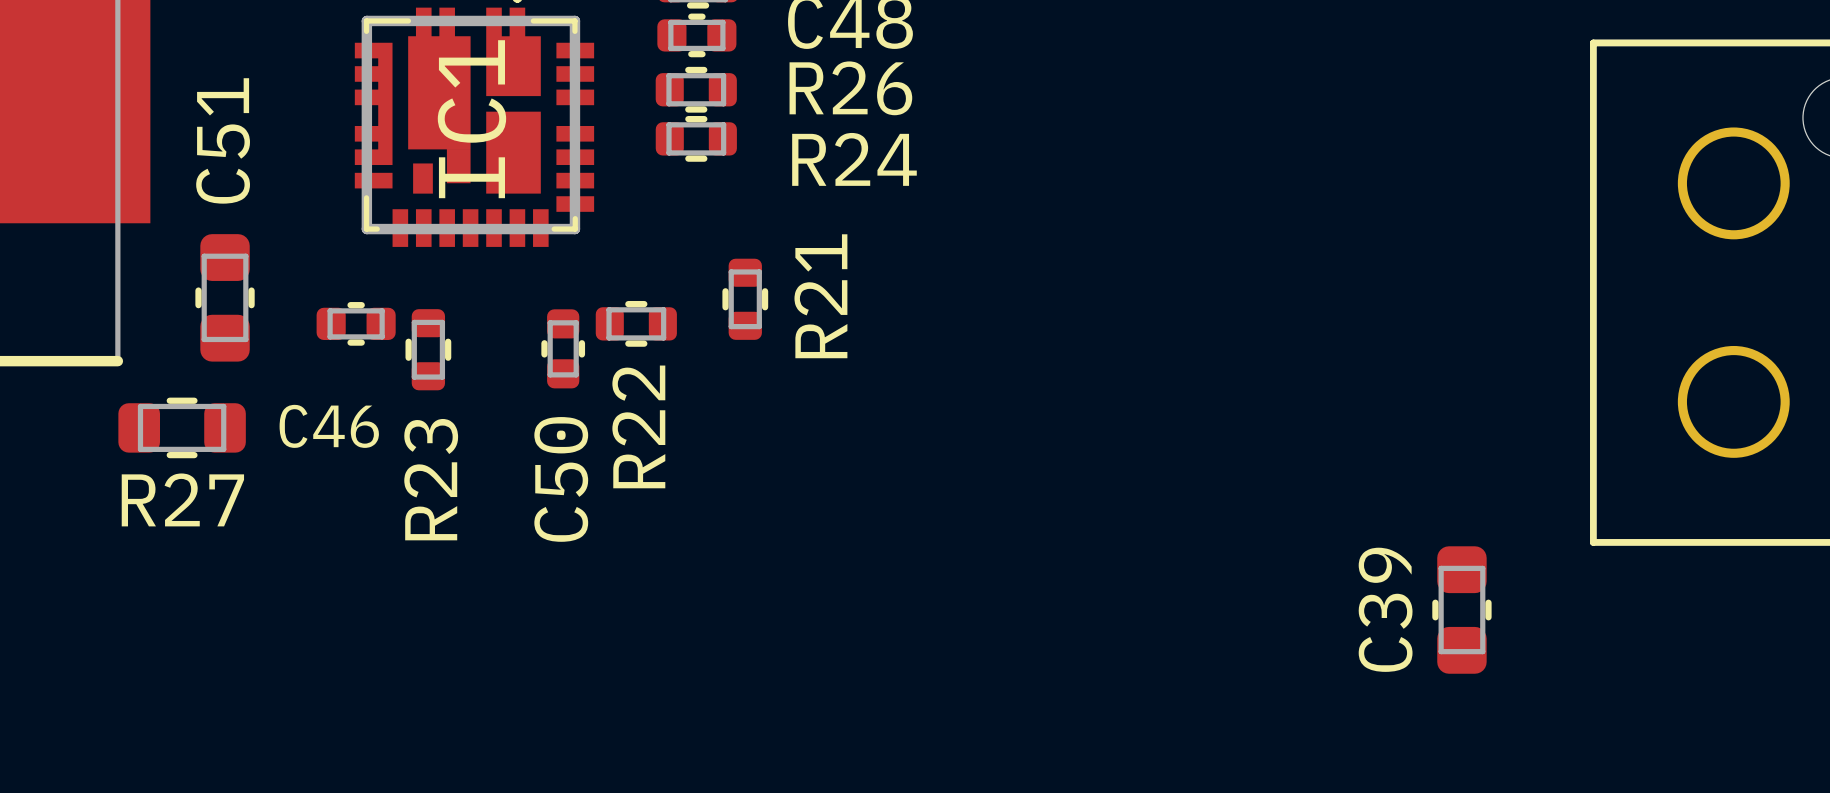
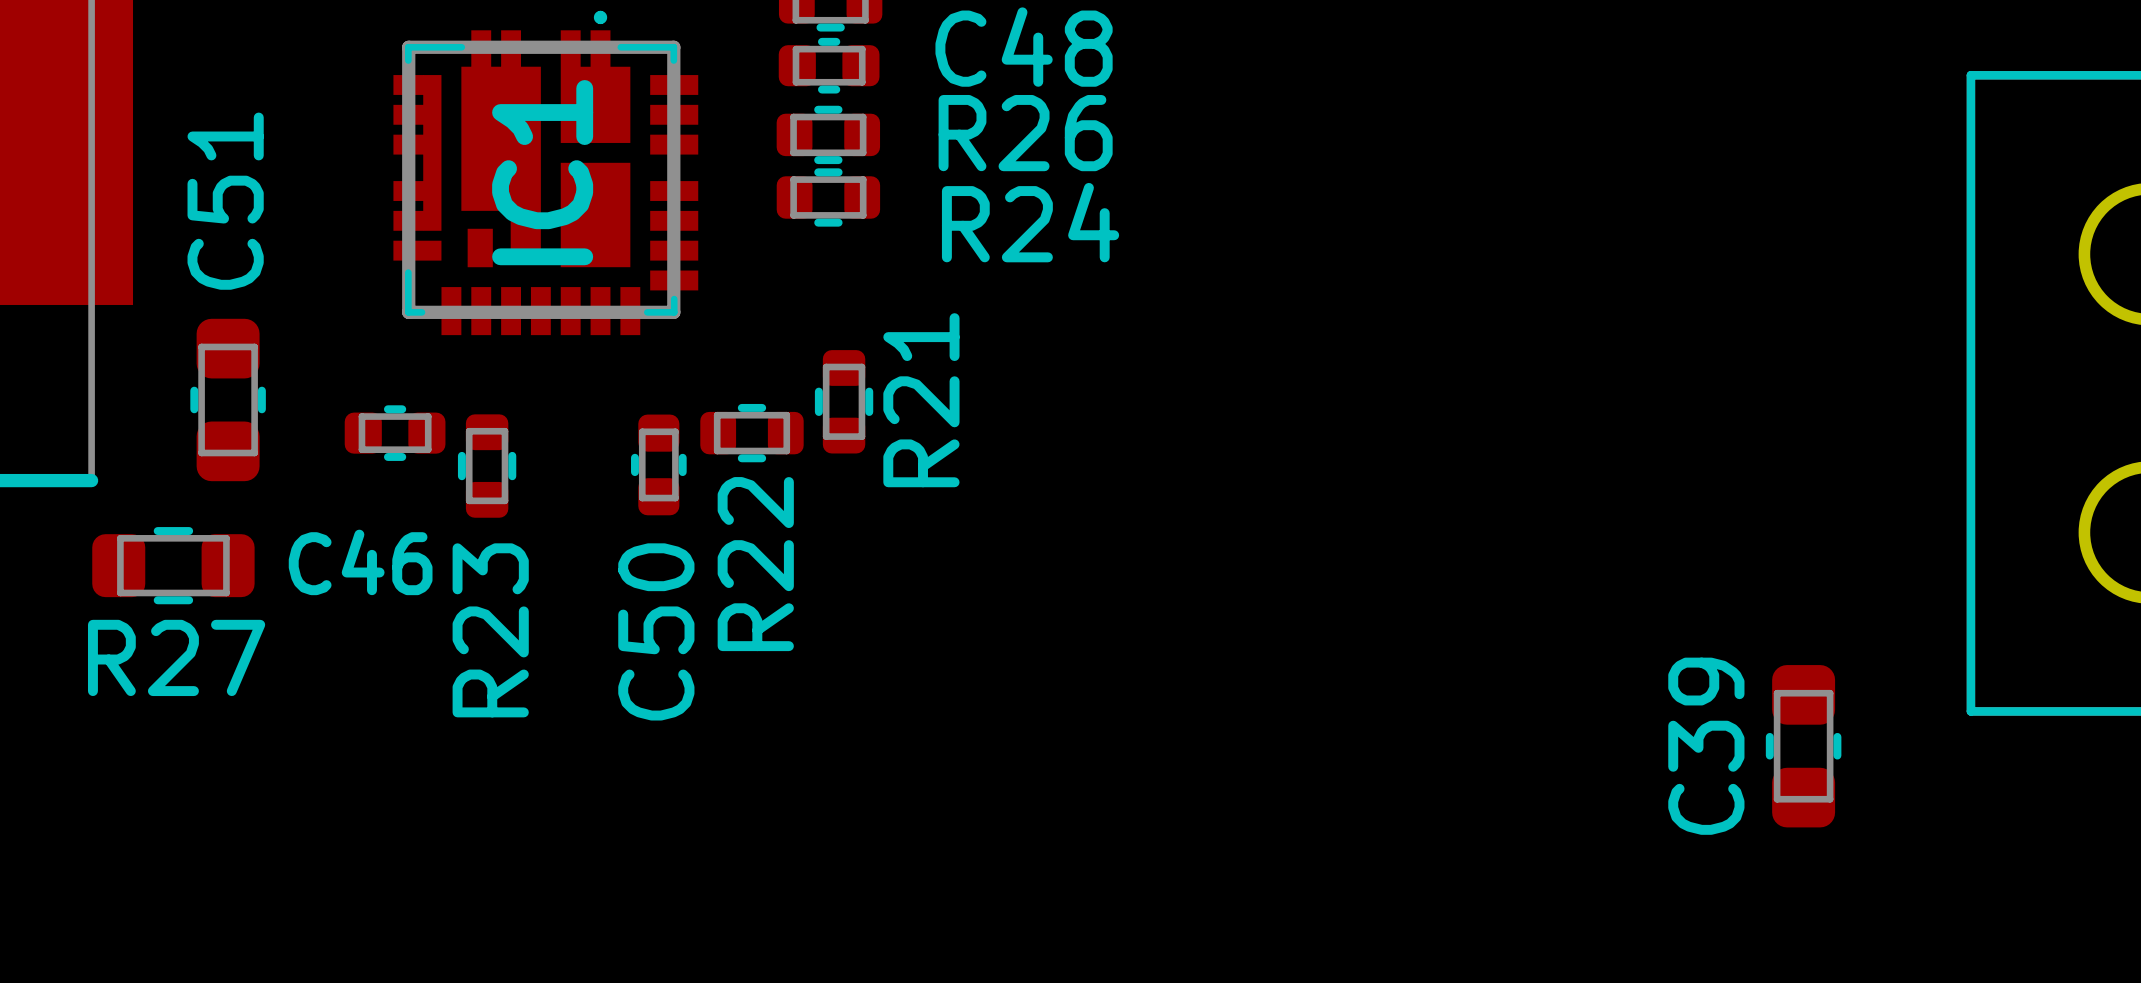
R21 name position: R21 (820, 296) -> R21 (921, 400)
R21 position: (745, 299) -> (844, 401)
C39 position: (1461, 610) -> (1803, 746)

